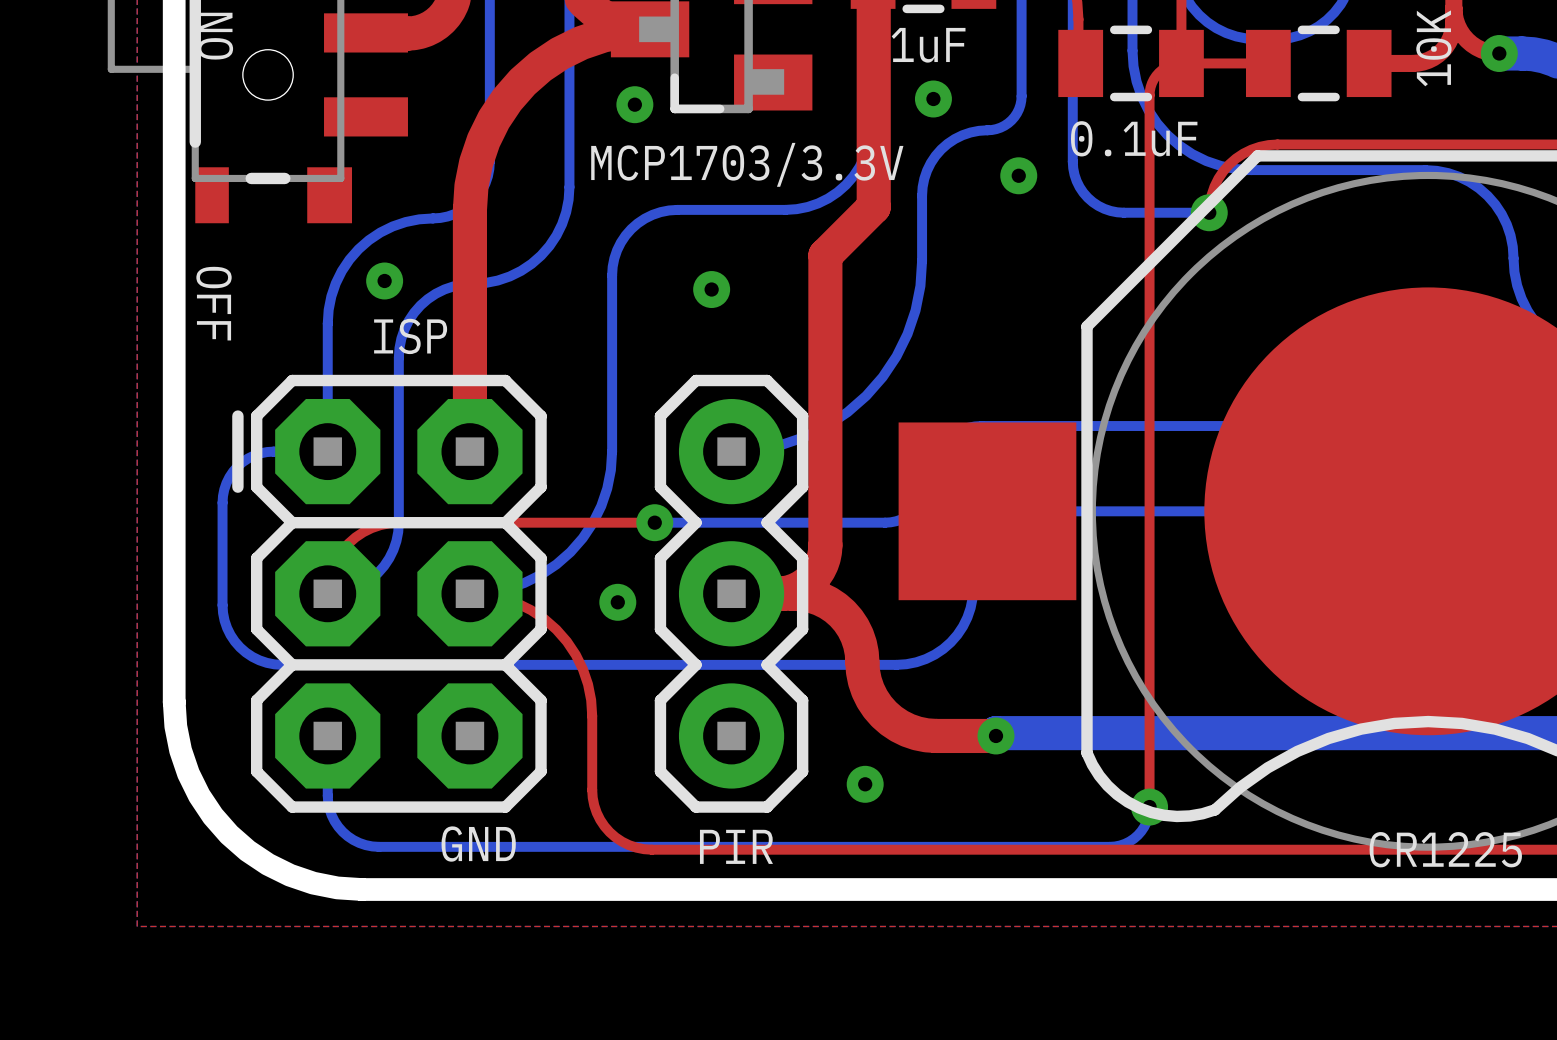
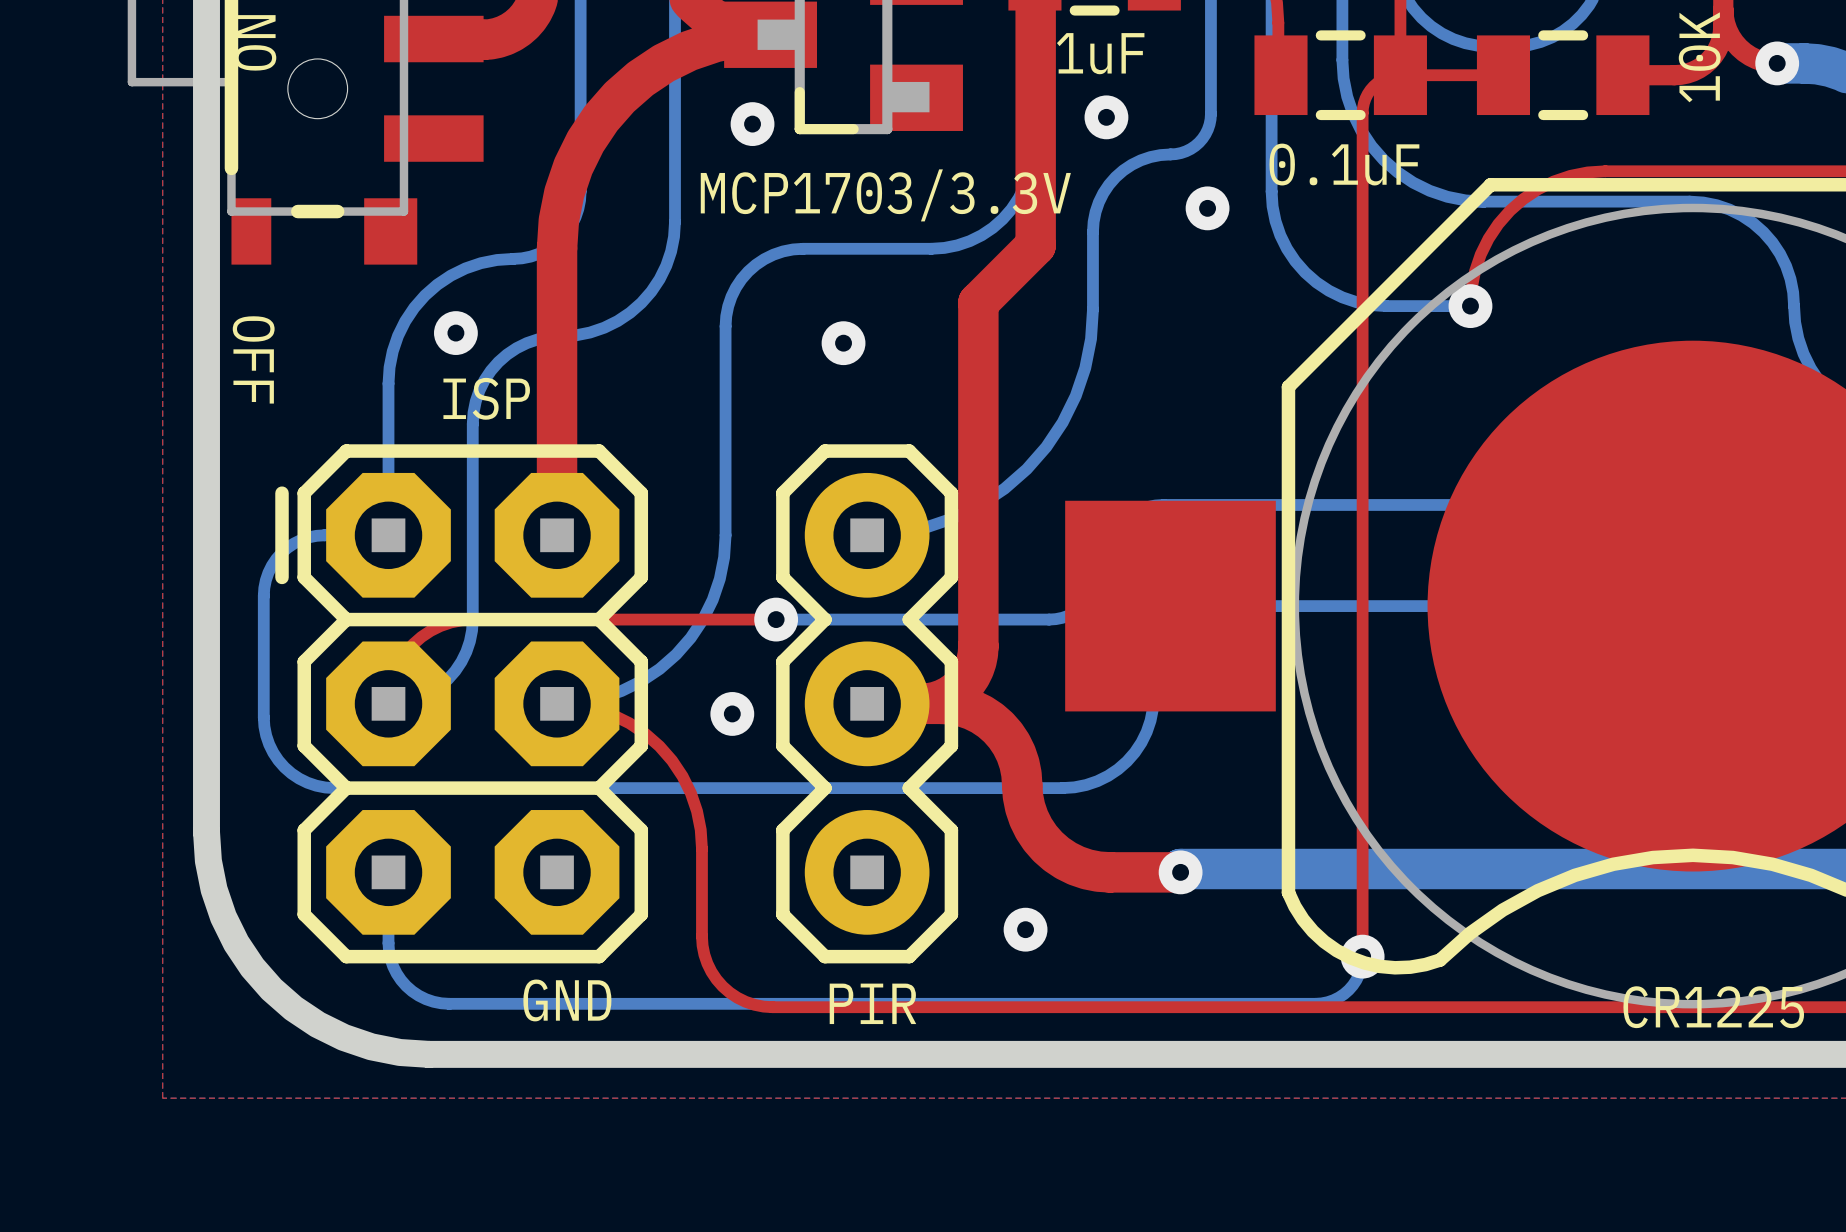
top track: (1354, 144) (1277, 144) (1251, 149) (1235, 158) (1223, 171) (1211, 195) (1209, 212) -> (1605, 171) (1587, 172) (1553, 181) (1537, 189) (1509, 210) (1488, 238) (1480, 254) (1471, 288) (1470, 306)
bottom track: (1072, 161) (1074, 174) (1079, 187) (1087, 197) (1104, 208) (1123, 212) (1209, 212) -> (1271, 191) (1275, 221) (1286, 248) (1305, 272) (1328, 290) (1356, 302) (1371, 305) (1470, 306)
via position: (1209, 212) -> (1470, 306)

